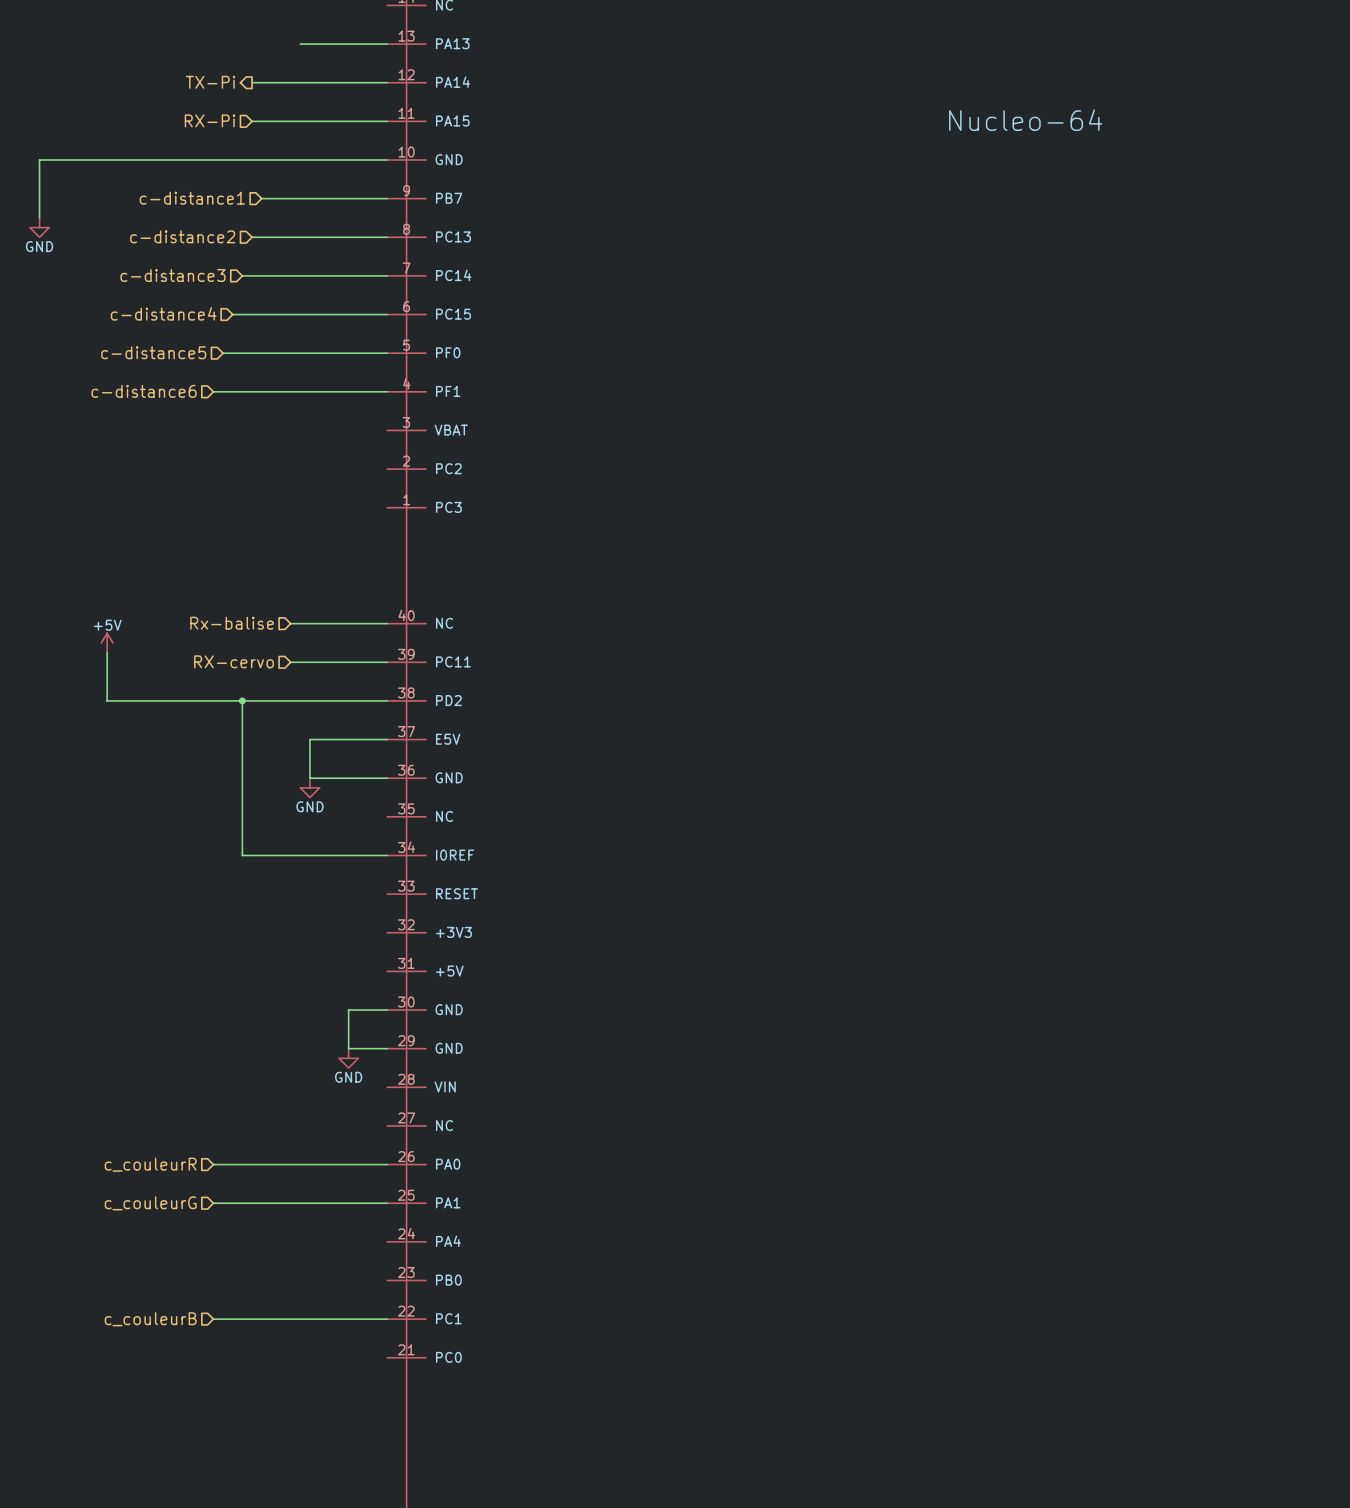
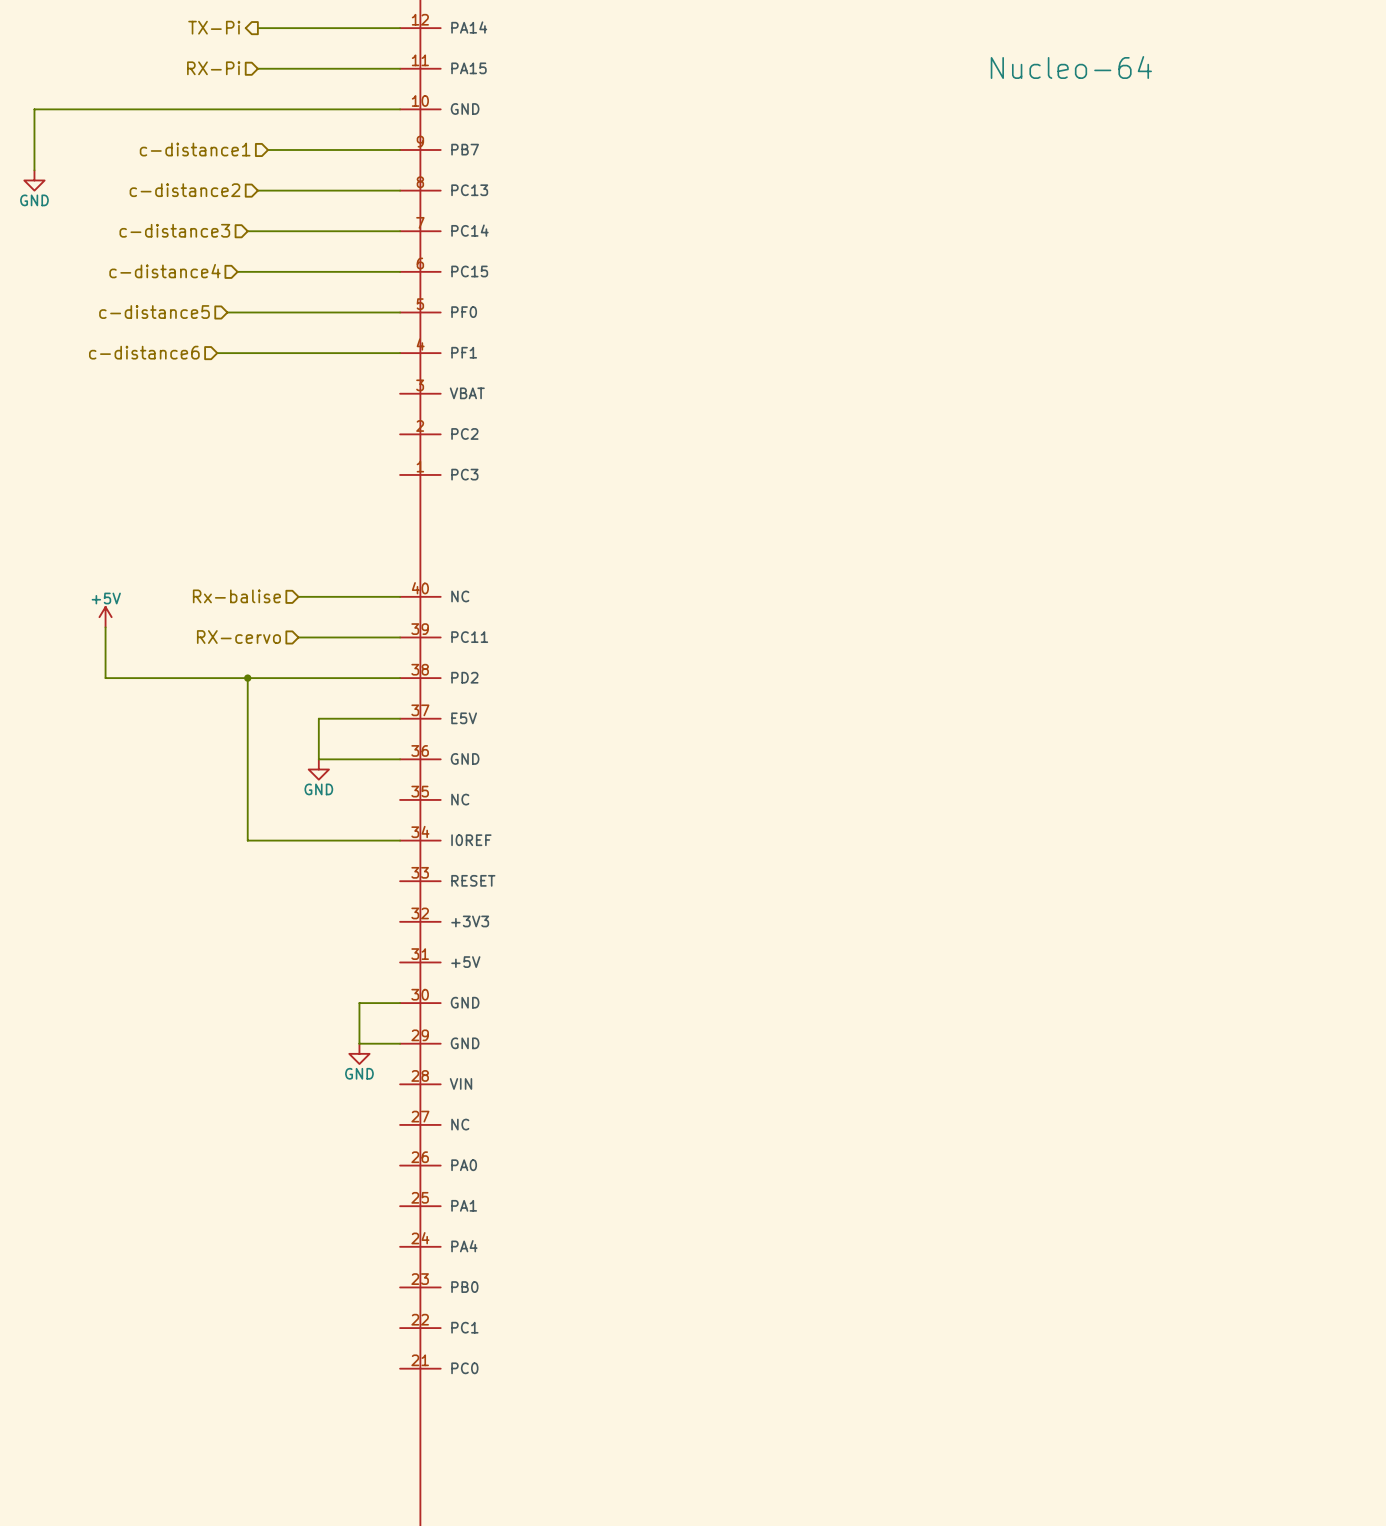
hierarchical label: c_couleurR (150, 1164) -> none
wire: (213, 1164) (387, 1164) -> none
hierarchical label: c_couleurG (150, 1203) -> none
wire: (213, 1203) (387, 1203) -> none
hierarchical label: c_couleurB (150, 1319) -> none
wire: (213, 1319) (387, 1319) -> none

